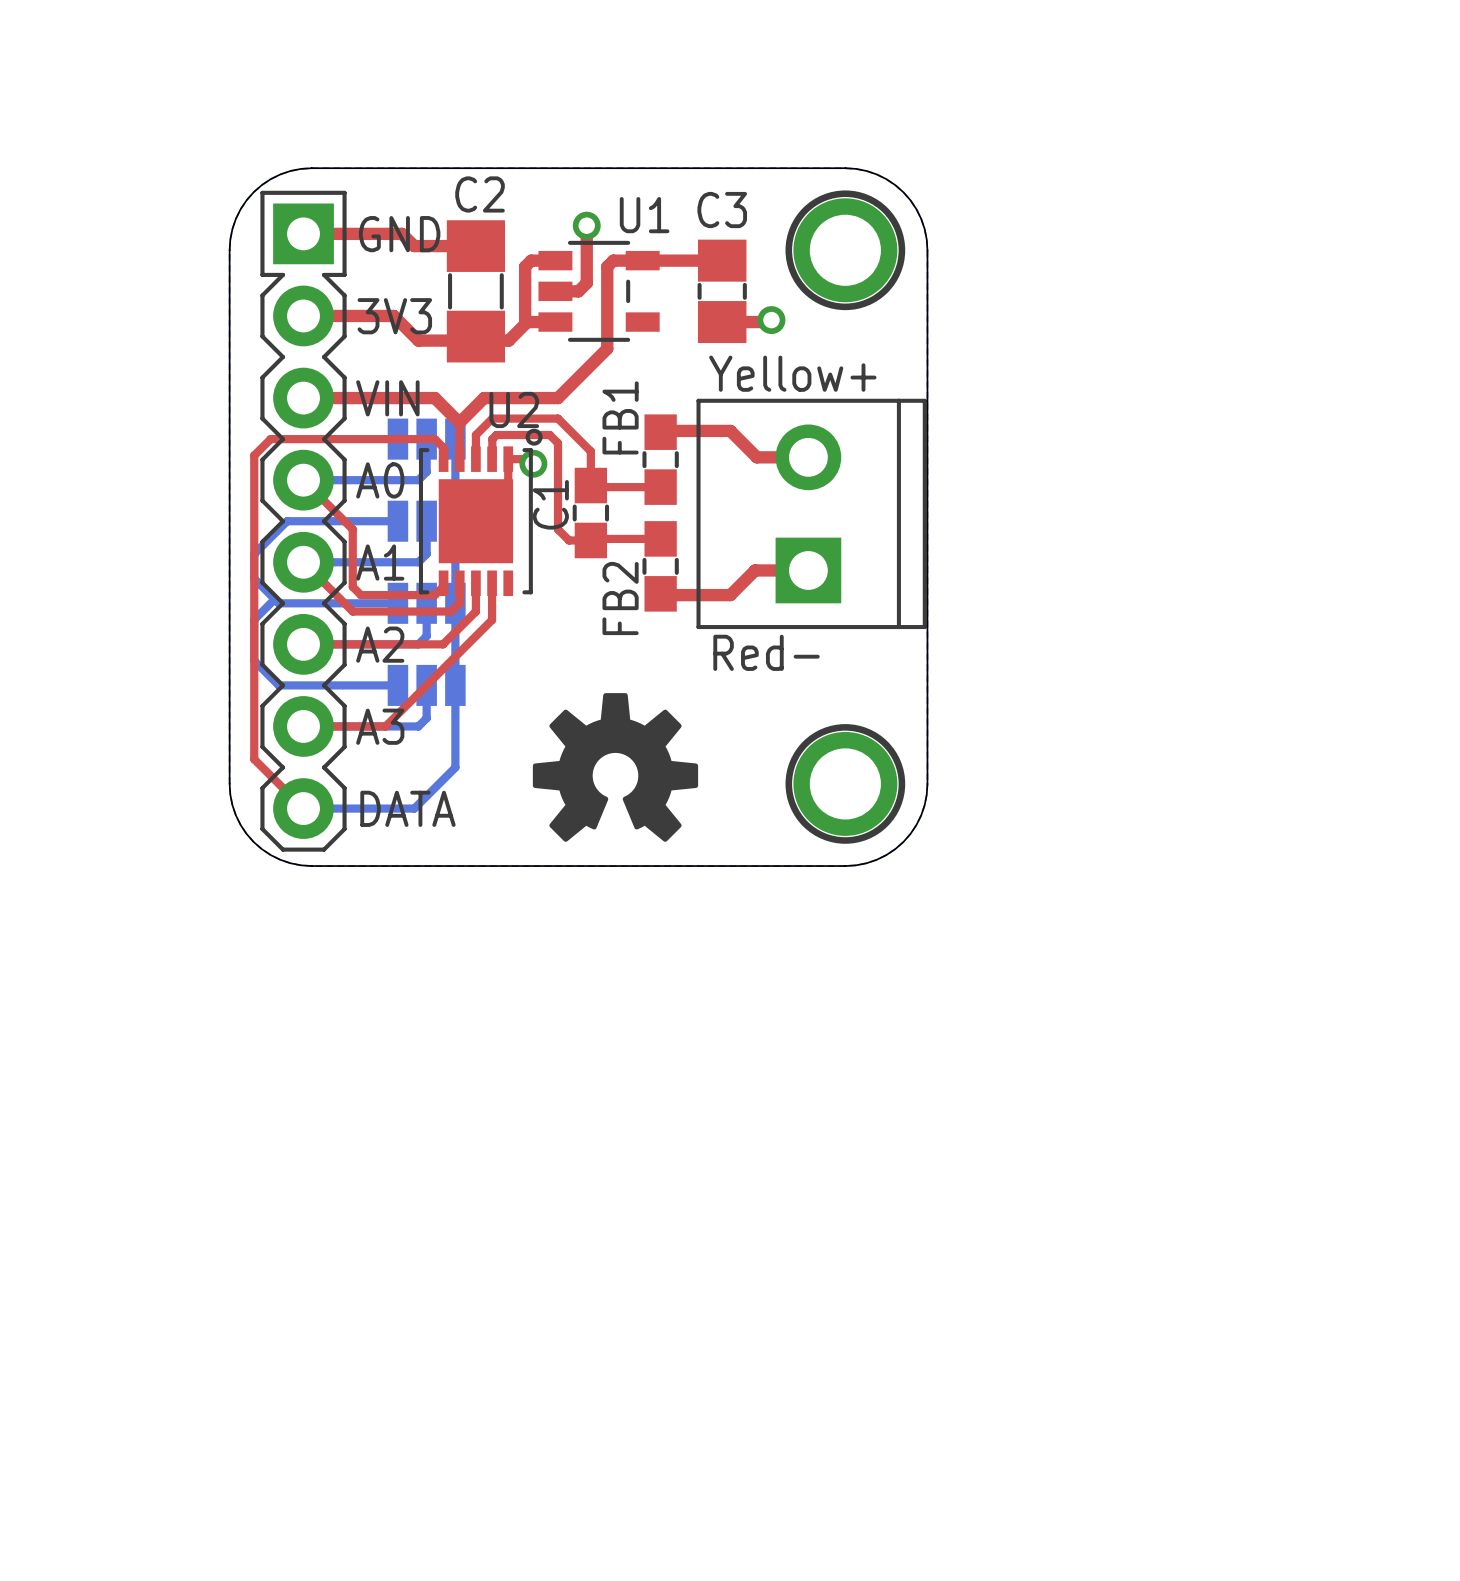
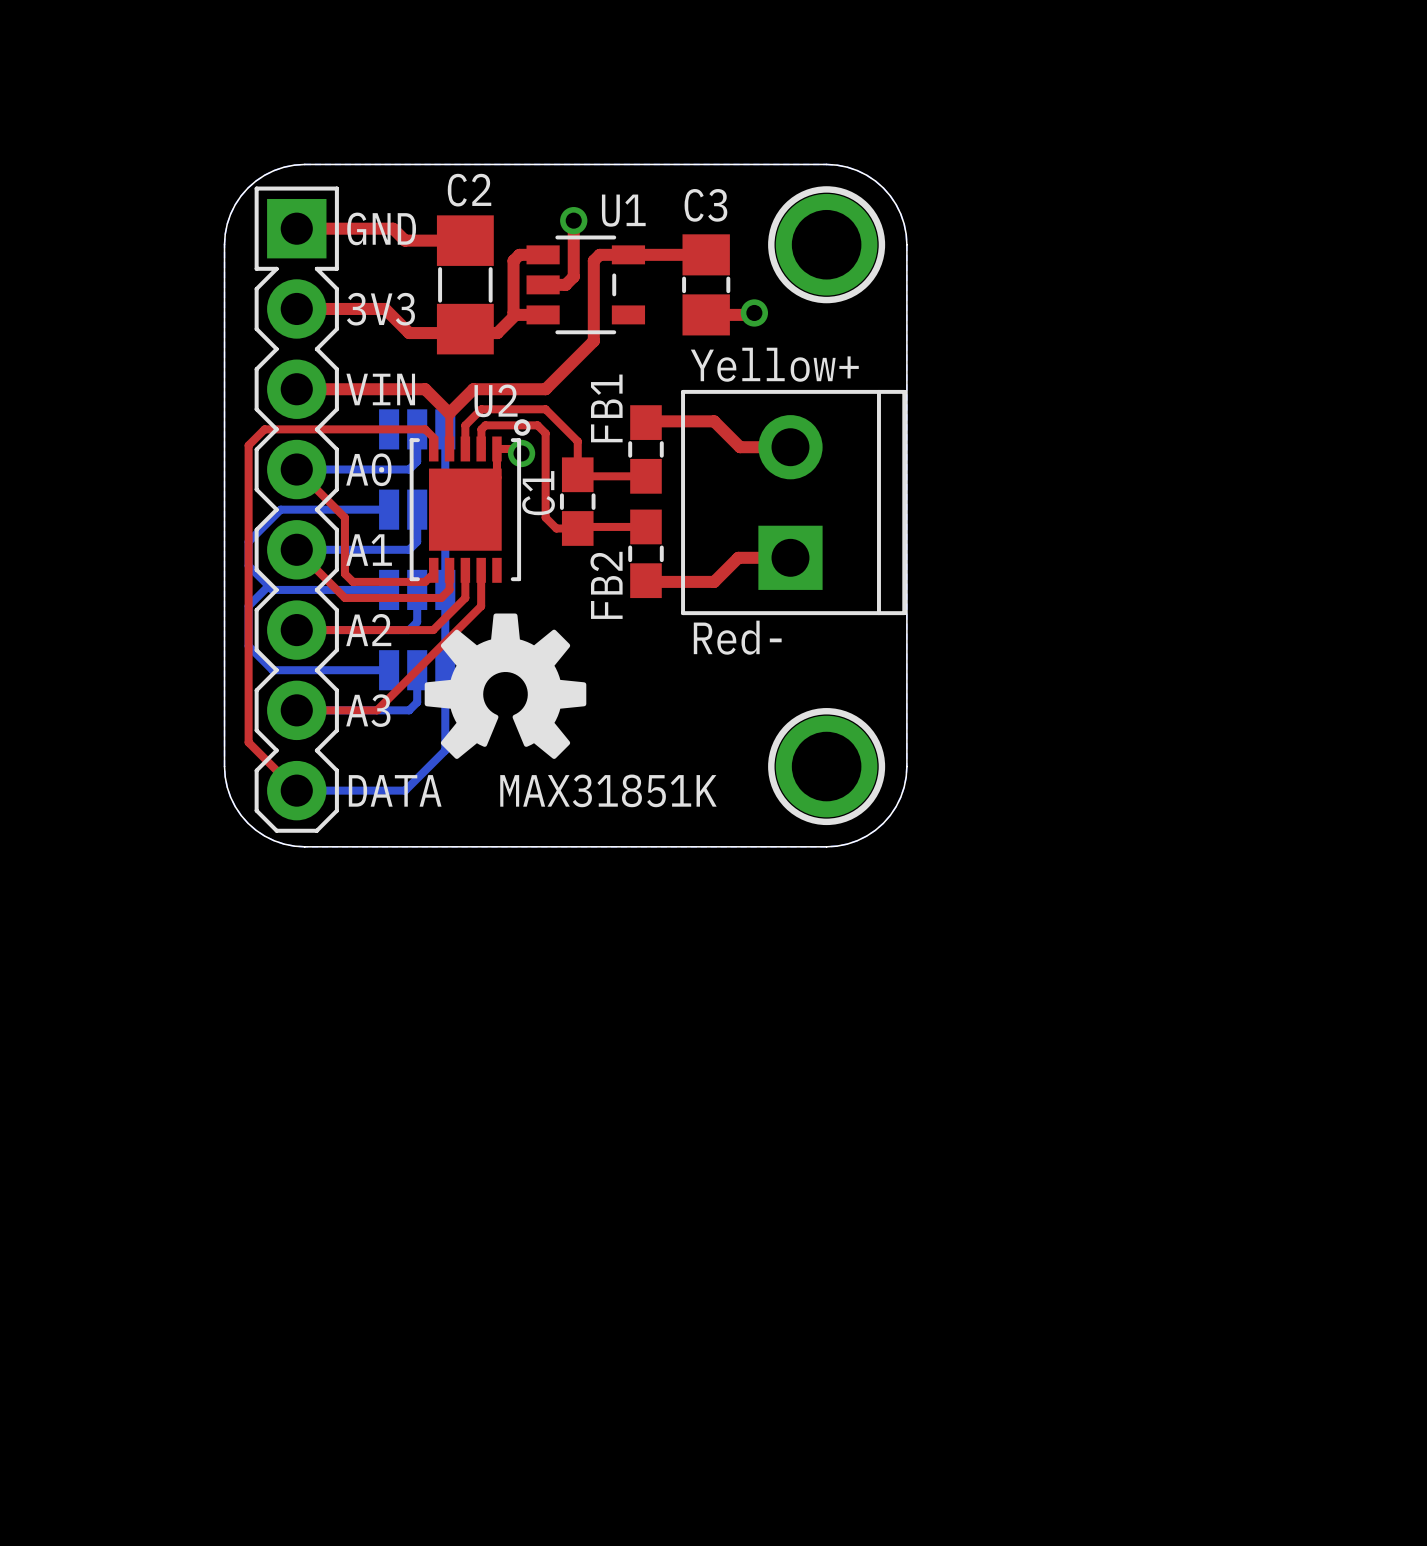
drawing position: (615, 767) -> (505, 686)
text: none -> MAX31851K (608, 790)

